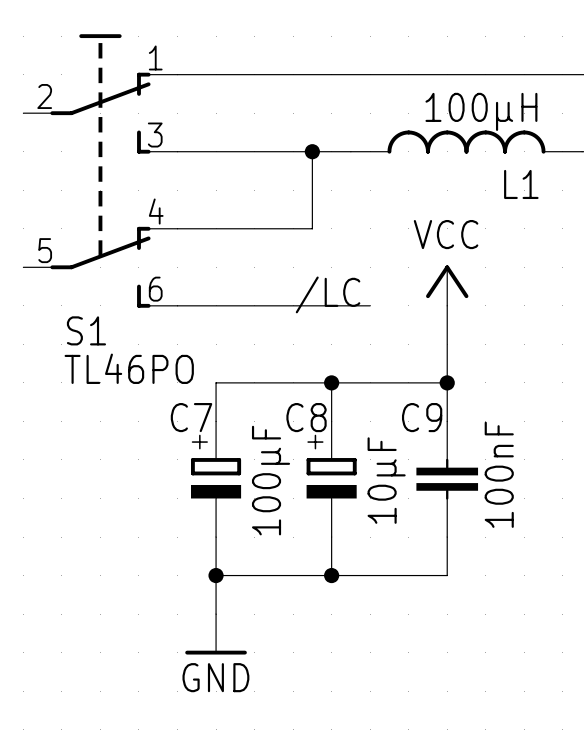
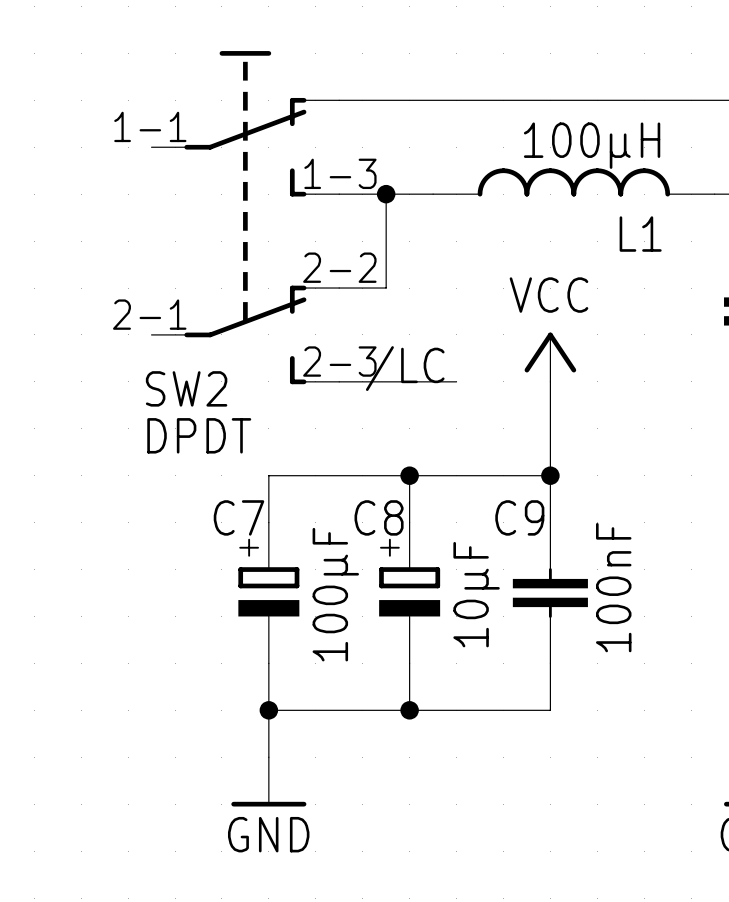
wire: (177, 74) (273, 74) -> none
wire: (177, 151) (273, 151) -> none
S1: TL46PO (100, 170) -> none
SW2: none -> DPDT (245, 217)
wire: (177, 228) (273, 228) -> none
wire: (177, 305) (273, 305) -> none

